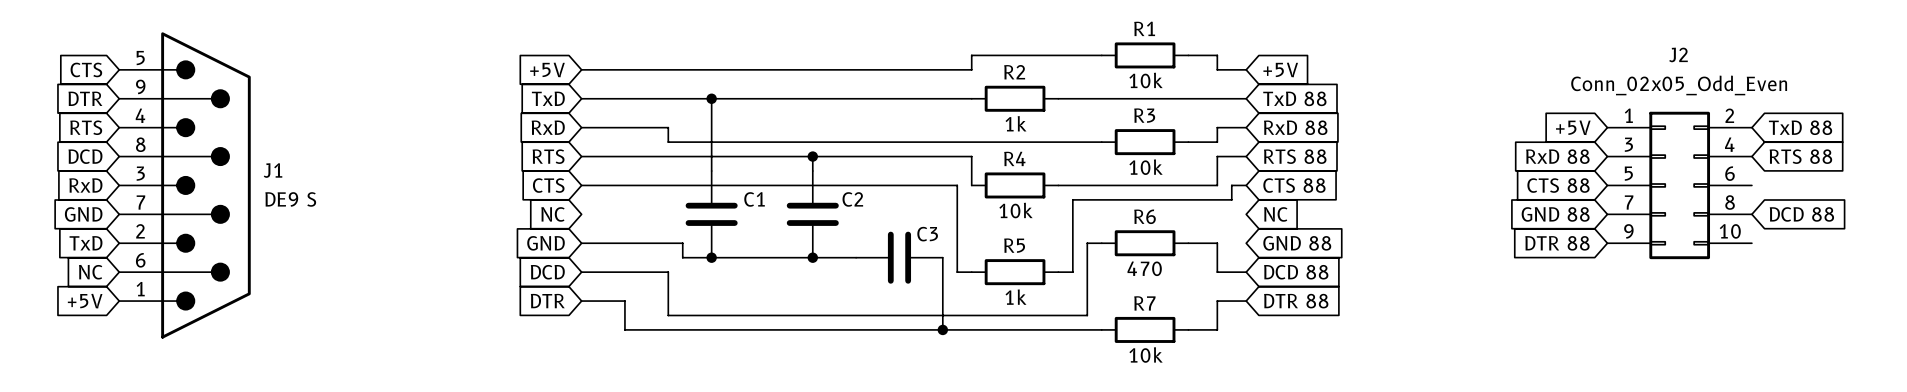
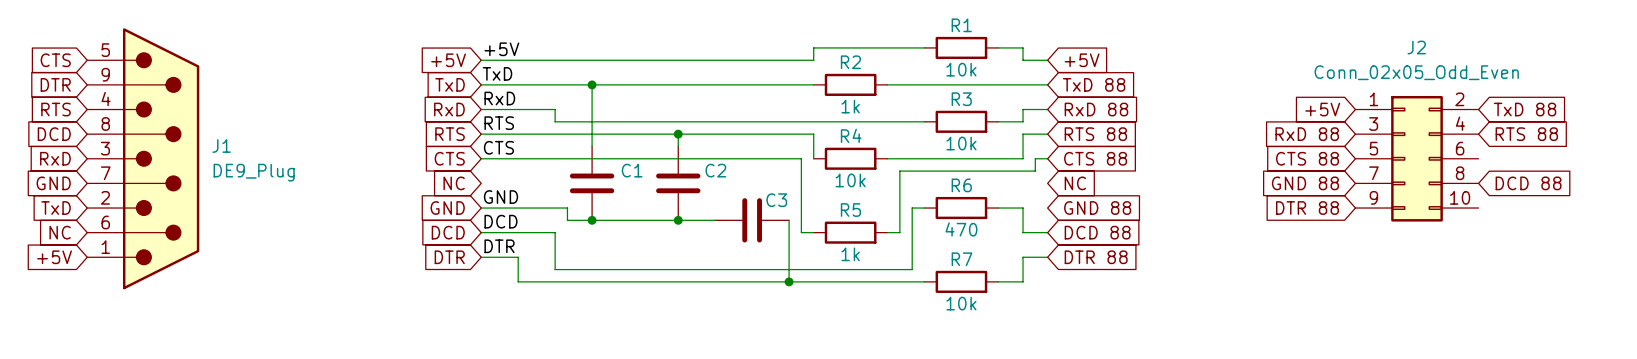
label: none -> +5V (501, 49)
label: none -> TxD (497, 73)
label: none -> RxD (499, 98)
label: none -> RTS (499, 123)
label: none -> CTS (498, 147)
J1 value: DE9 S (290, 199) -> DE9_Plug (254, 172)
label: none -> GND (500, 197)
label: none -> DCD (500, 221)
label: none -> DTR (499, 246)

